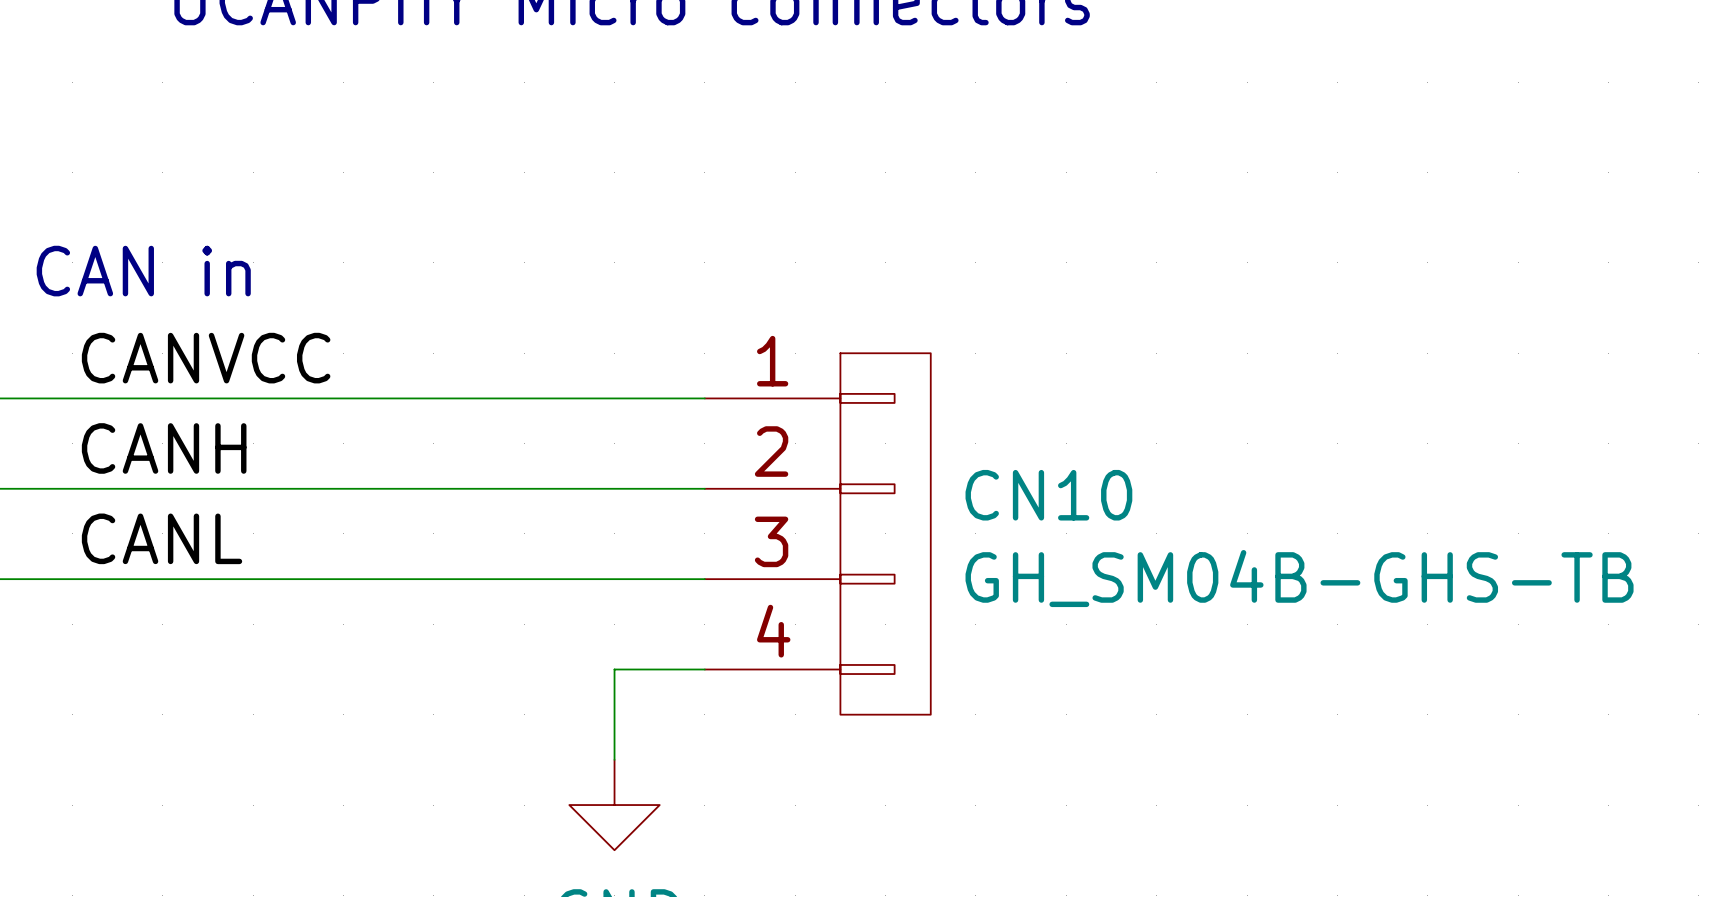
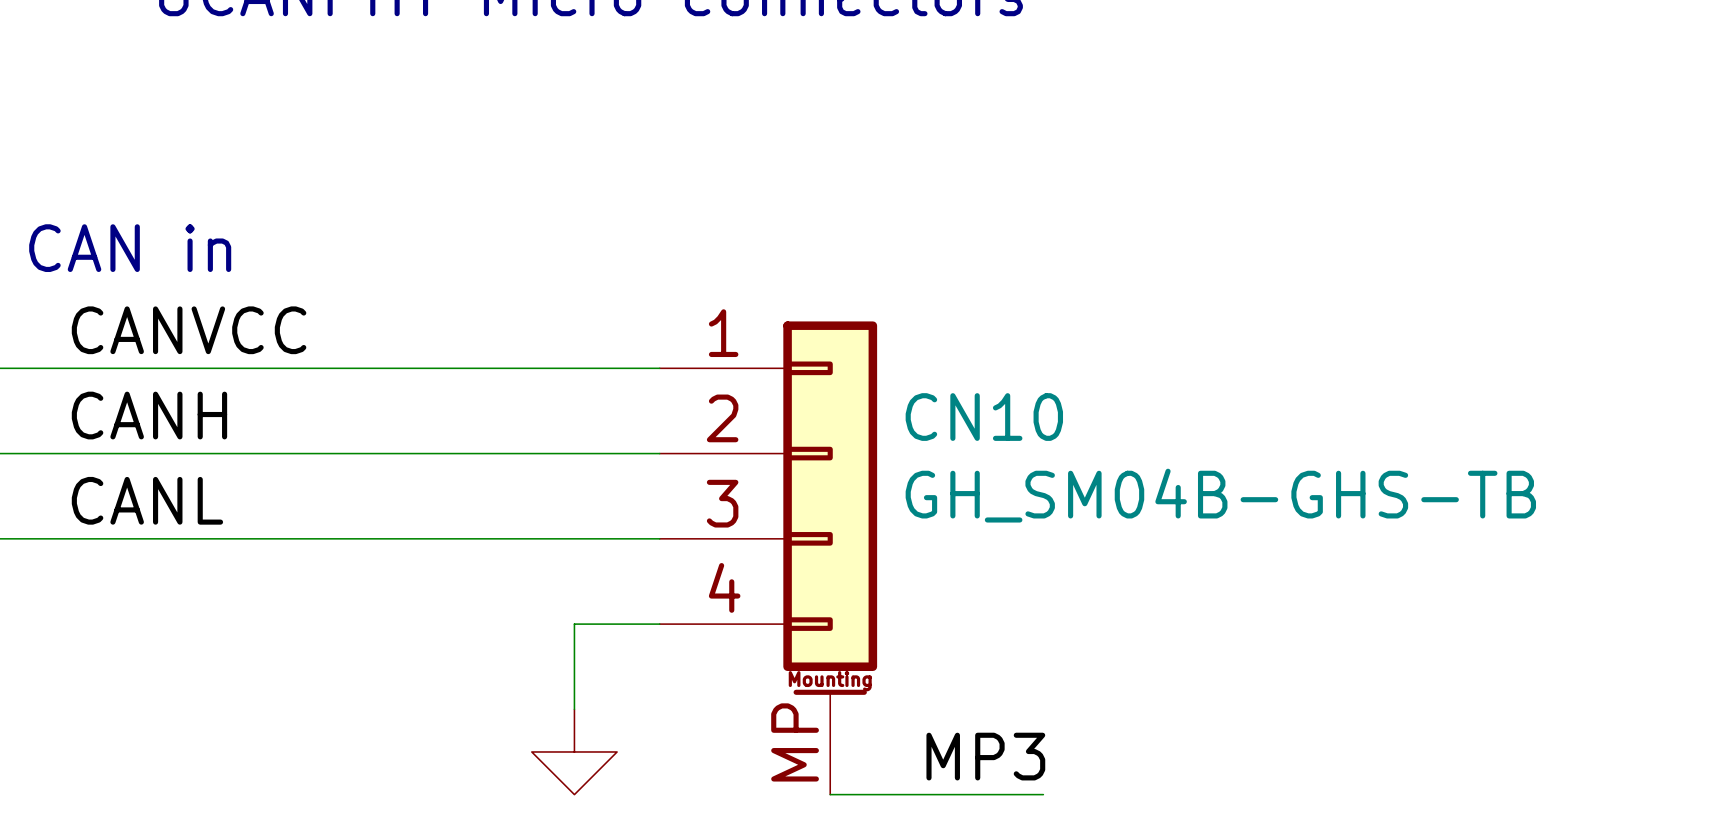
CN10 symbol: [704, 353, 931, 715] -> [659, 321, 878, 795]
CN10 name position: CN10 (1048, 495) -> CN10 (984, 417)
CN10 value position: GH_SM04B-GHS-TB (1299, 578) -> GH_SM04B-GHS-TB (1220, 495)
label: none -> MP3 (985, 756)
wire: none -> (830, 794) (1043, 794)

